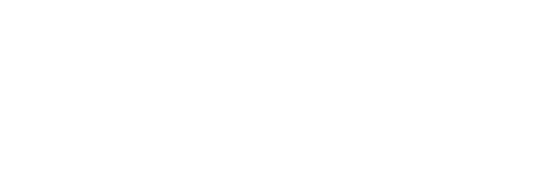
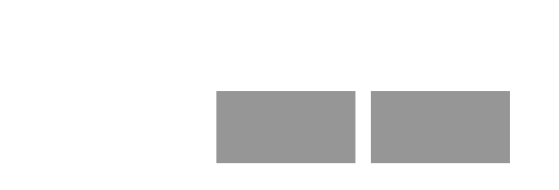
part: none -> (285, 127)
part: none -> (440, 127)

